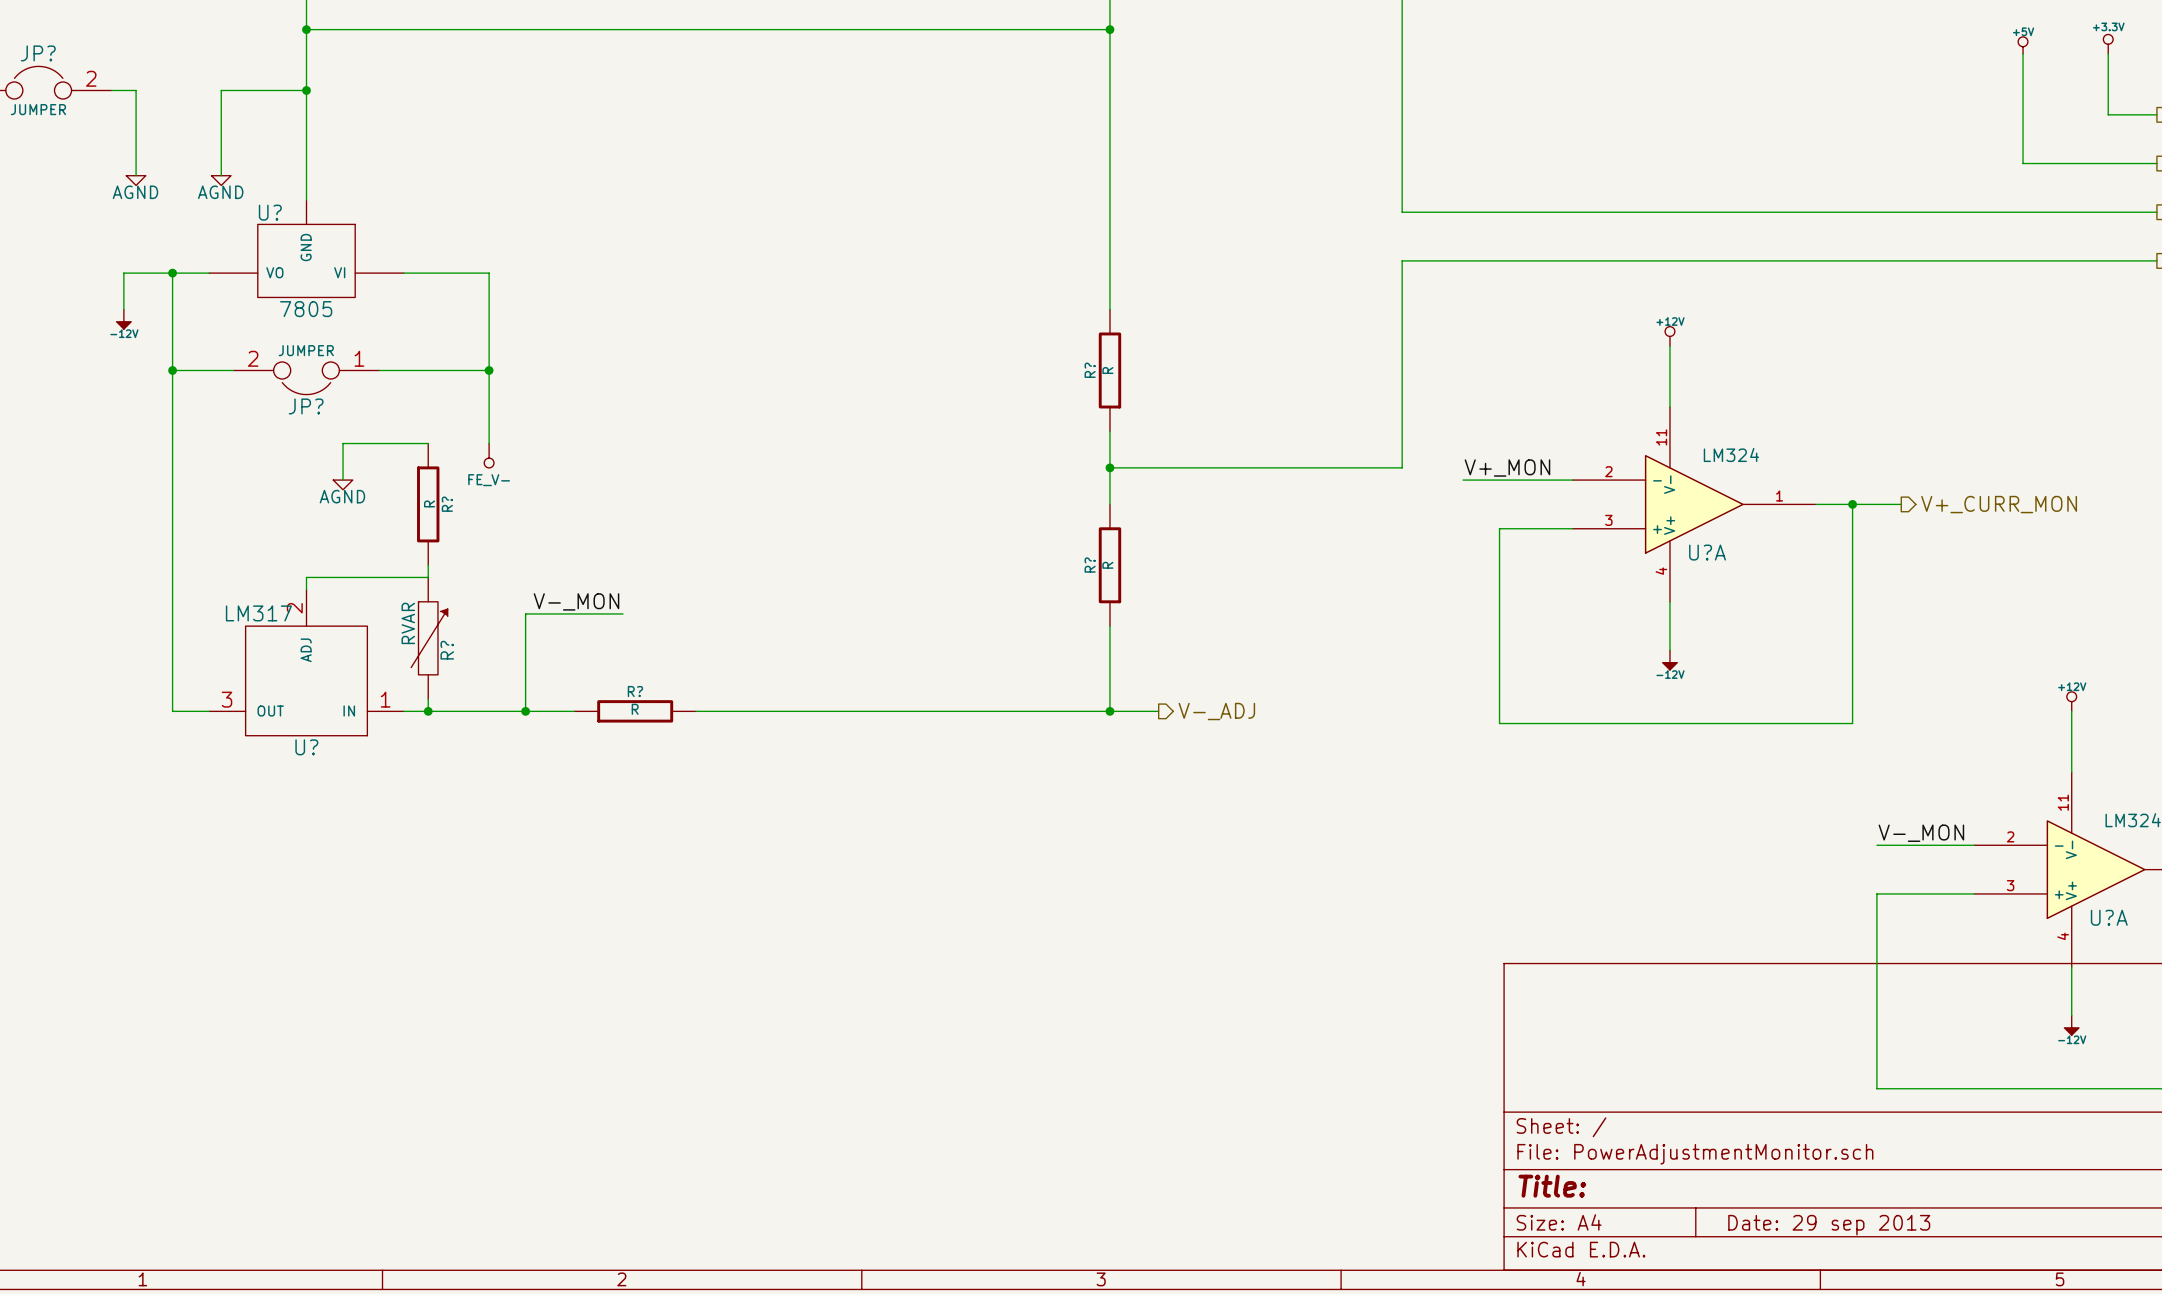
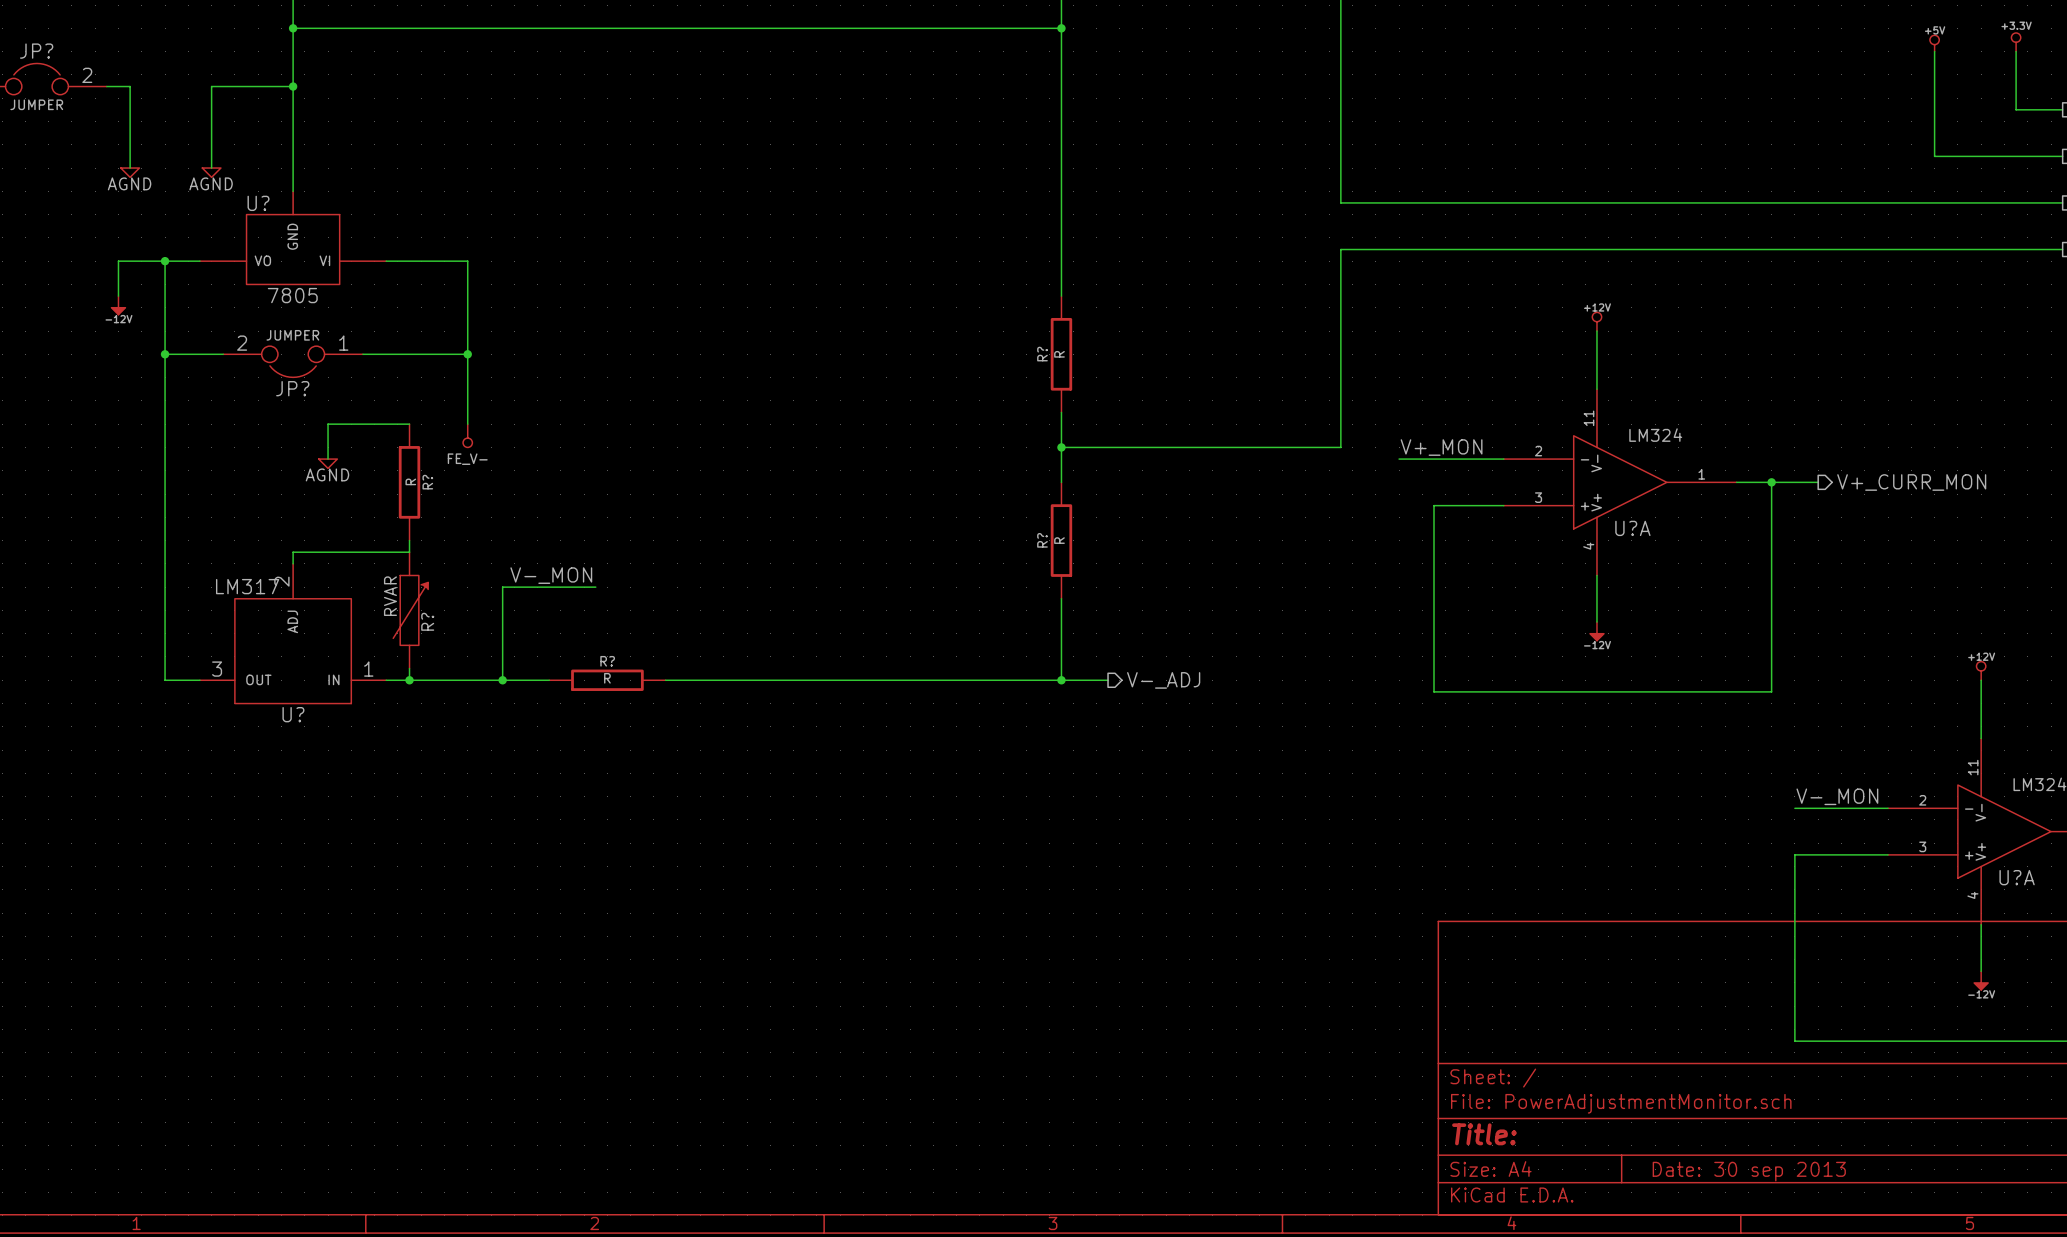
title block: Date: 29 sep 2013 (1829, 1225) -> Date: 30 sep 2013 (1749, 1171)

